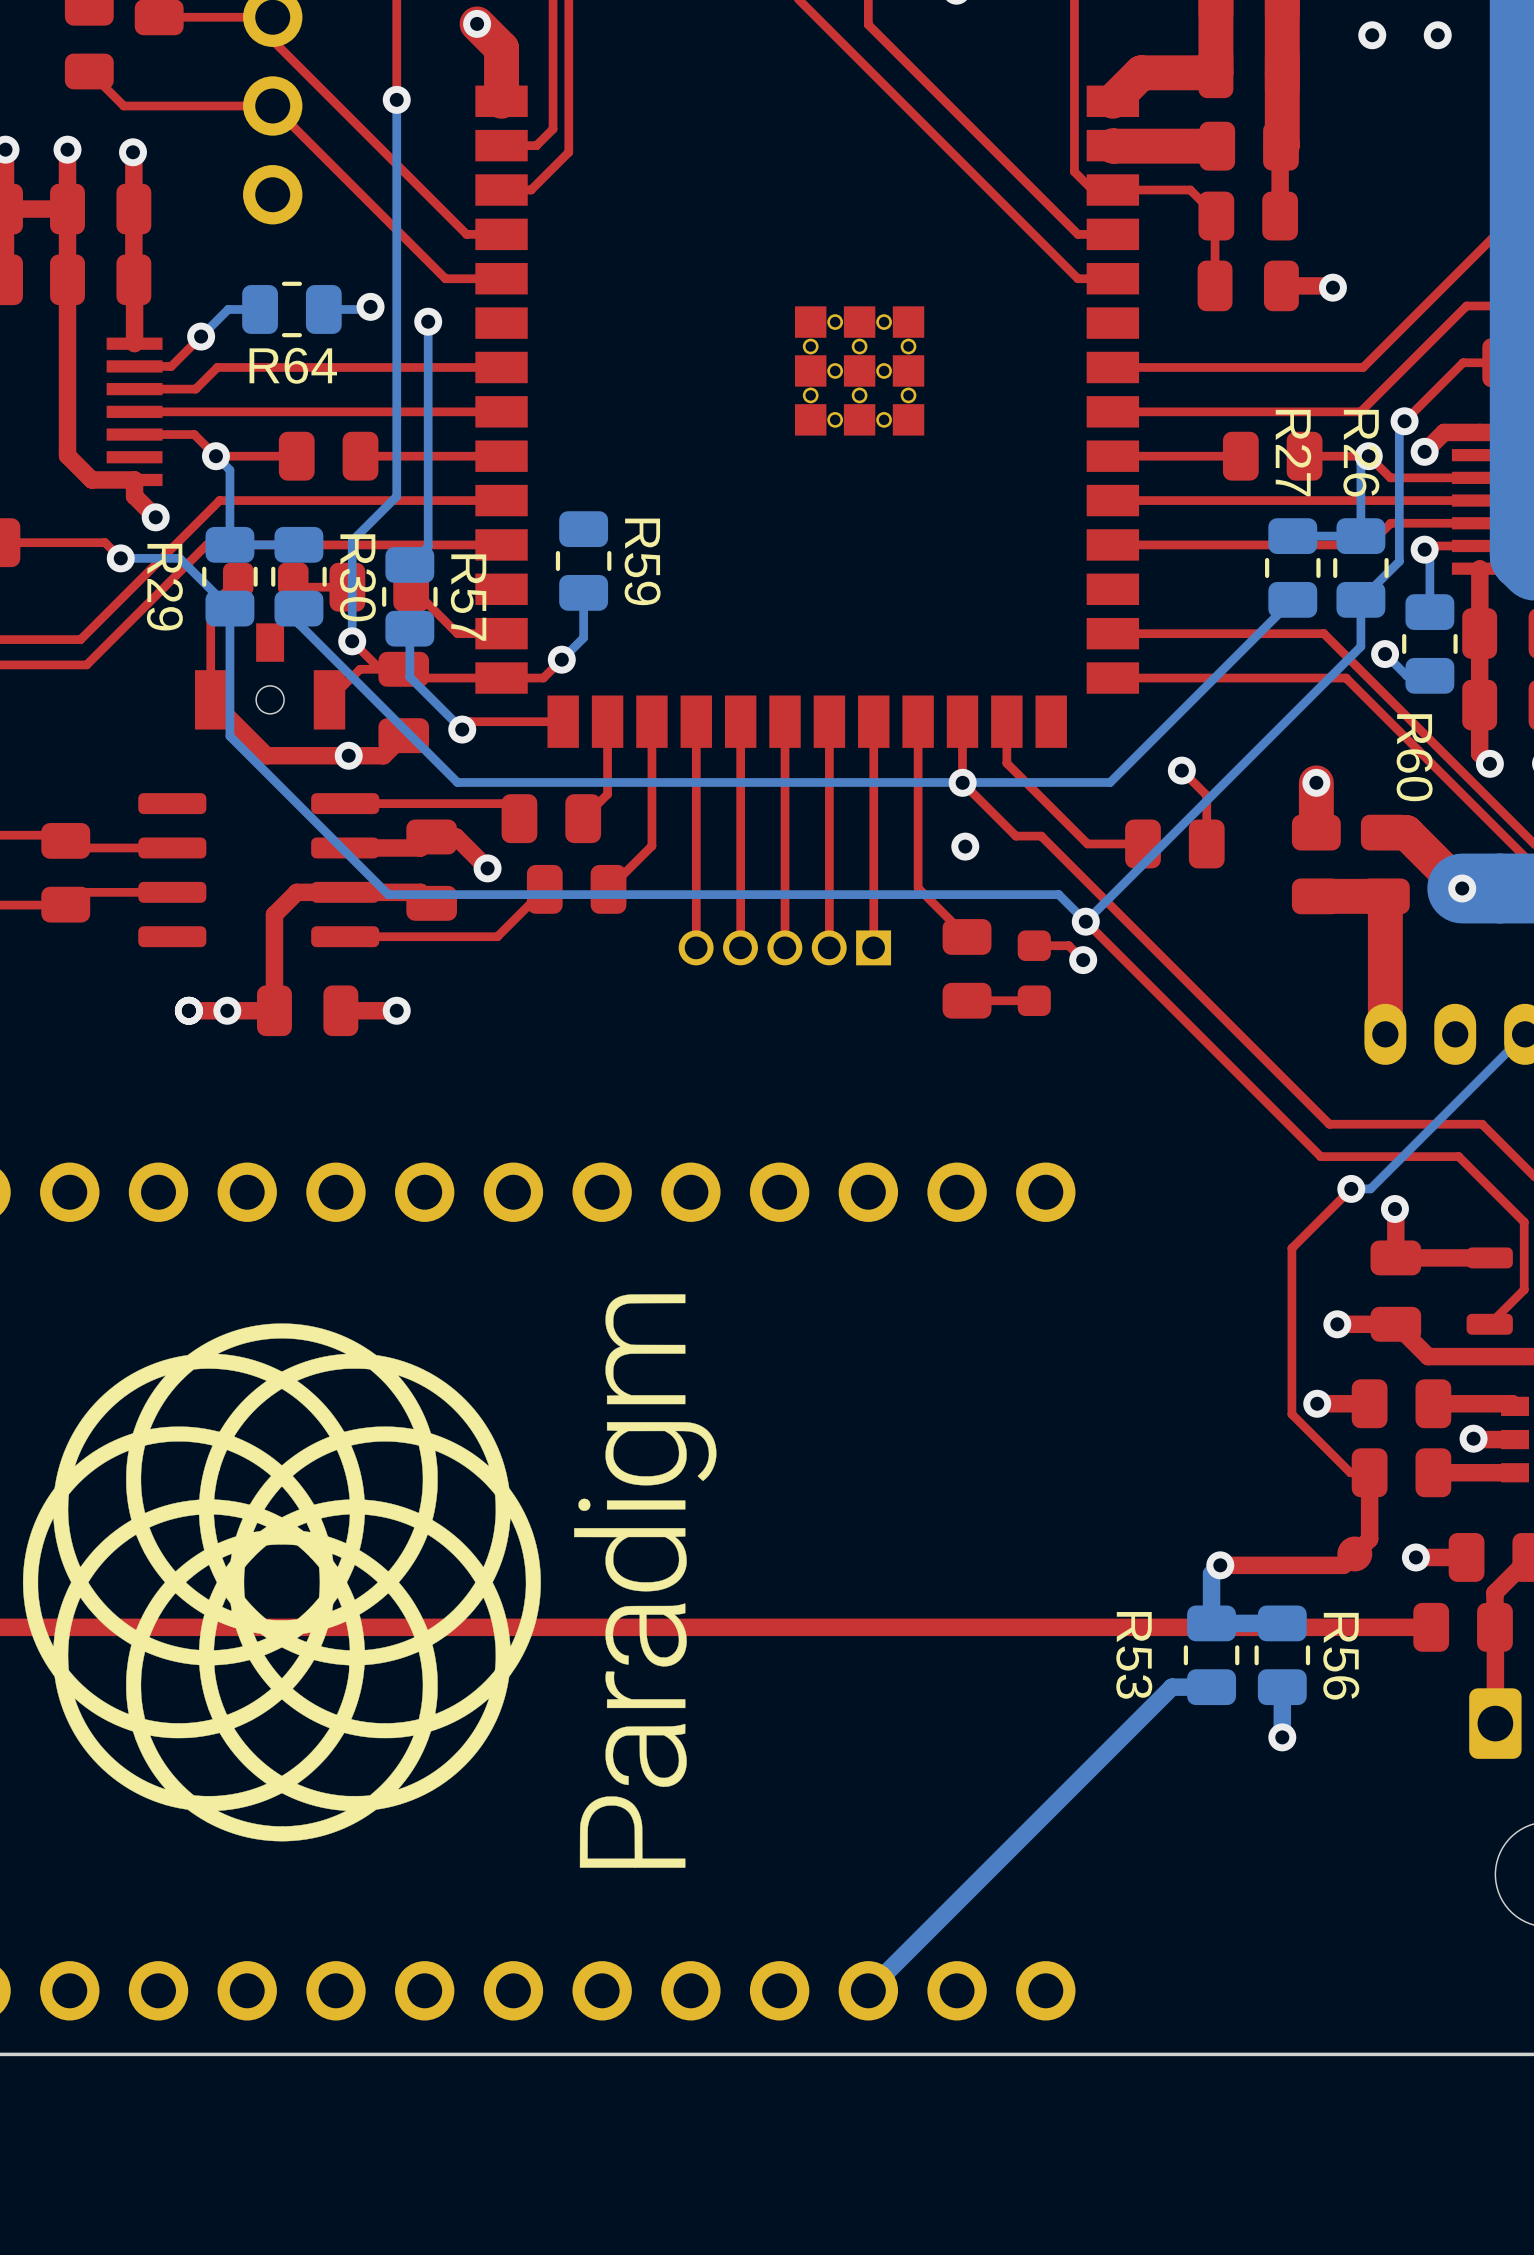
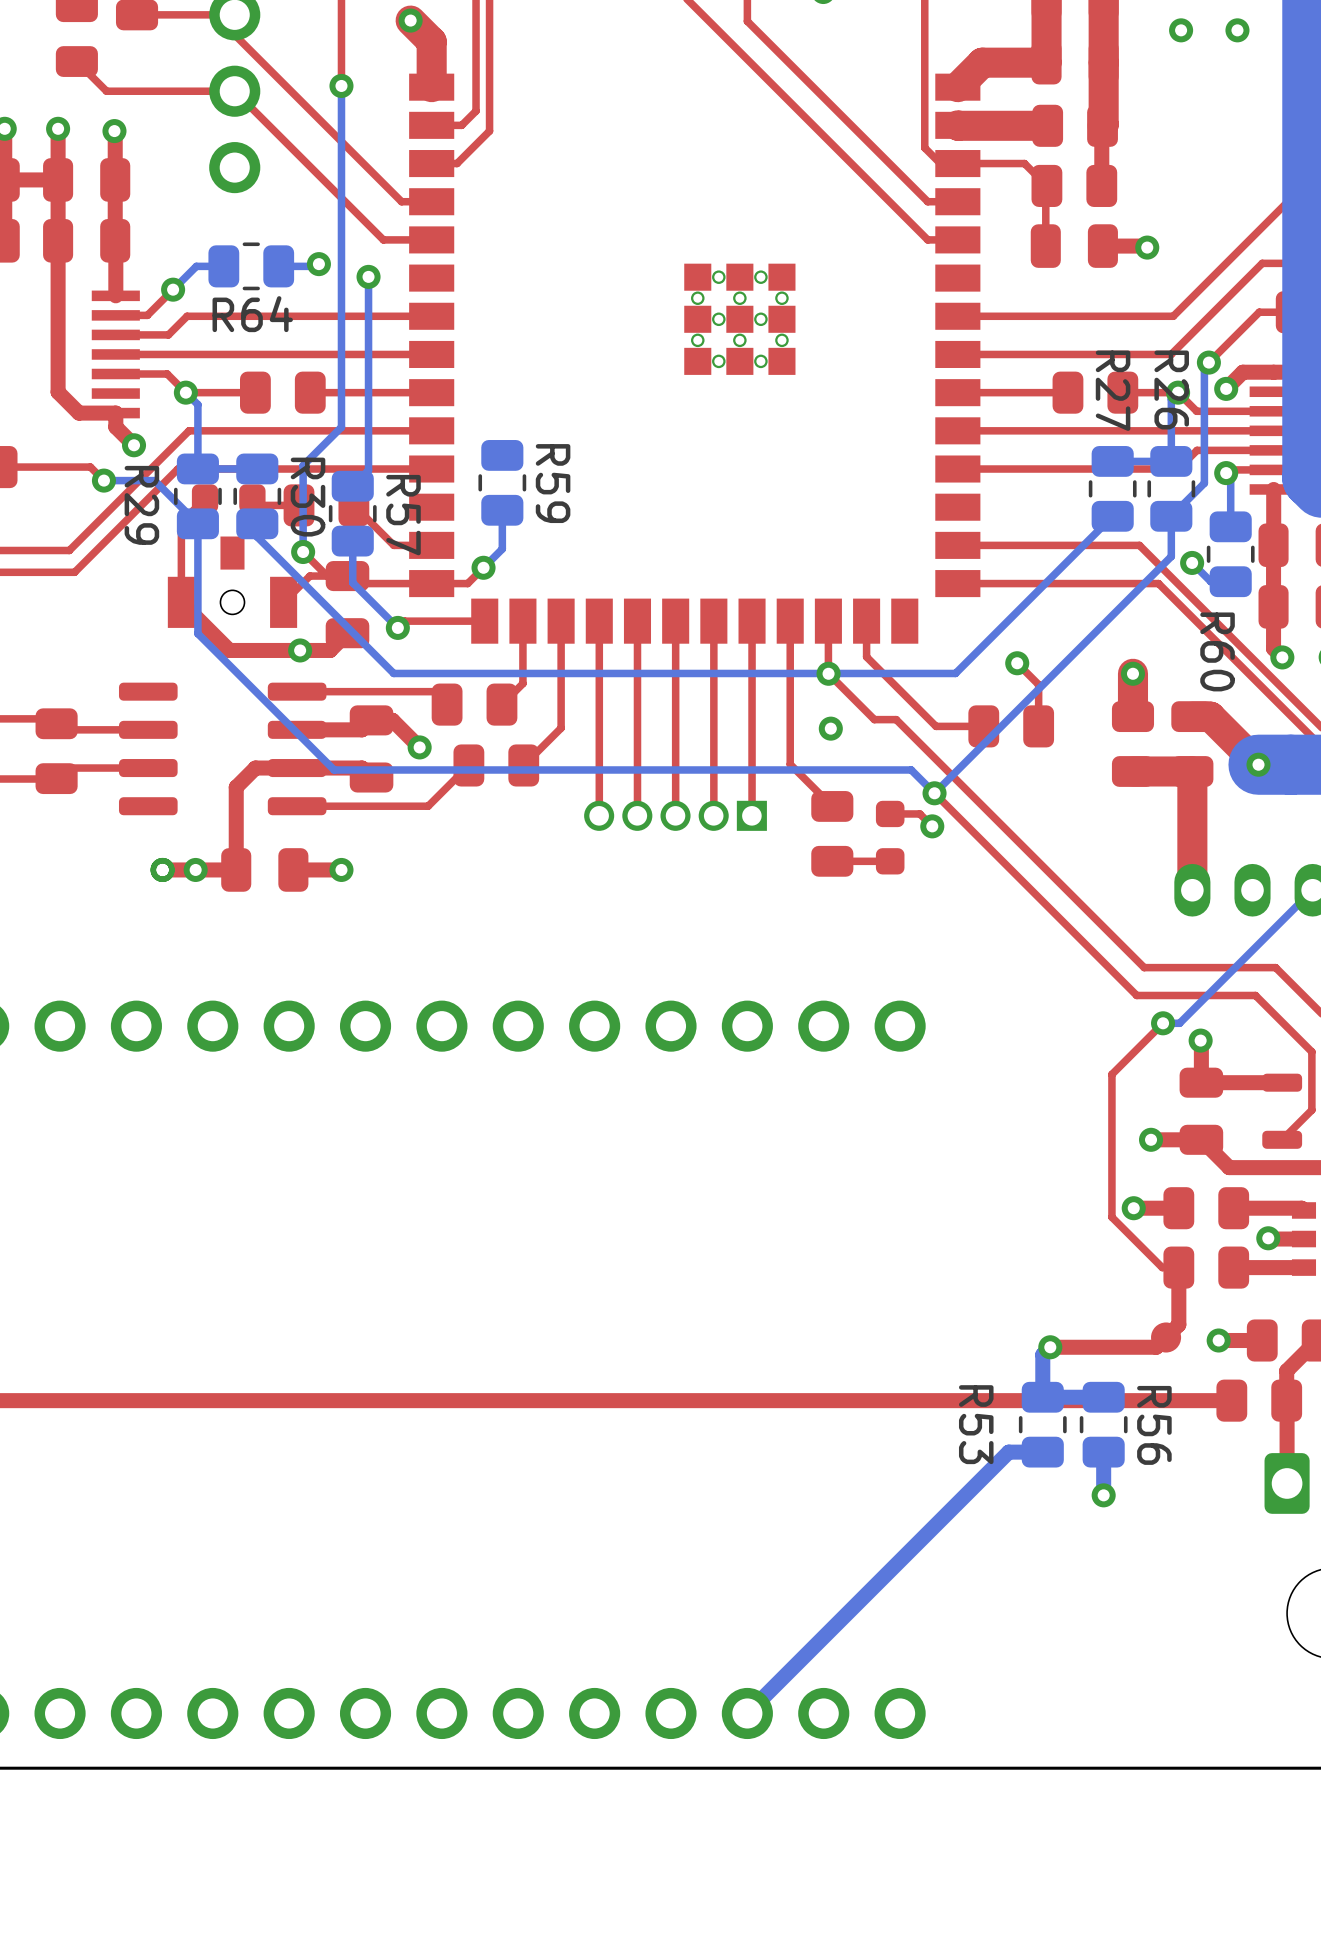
drawing: [22, 1294, 717, 1868] -> none

